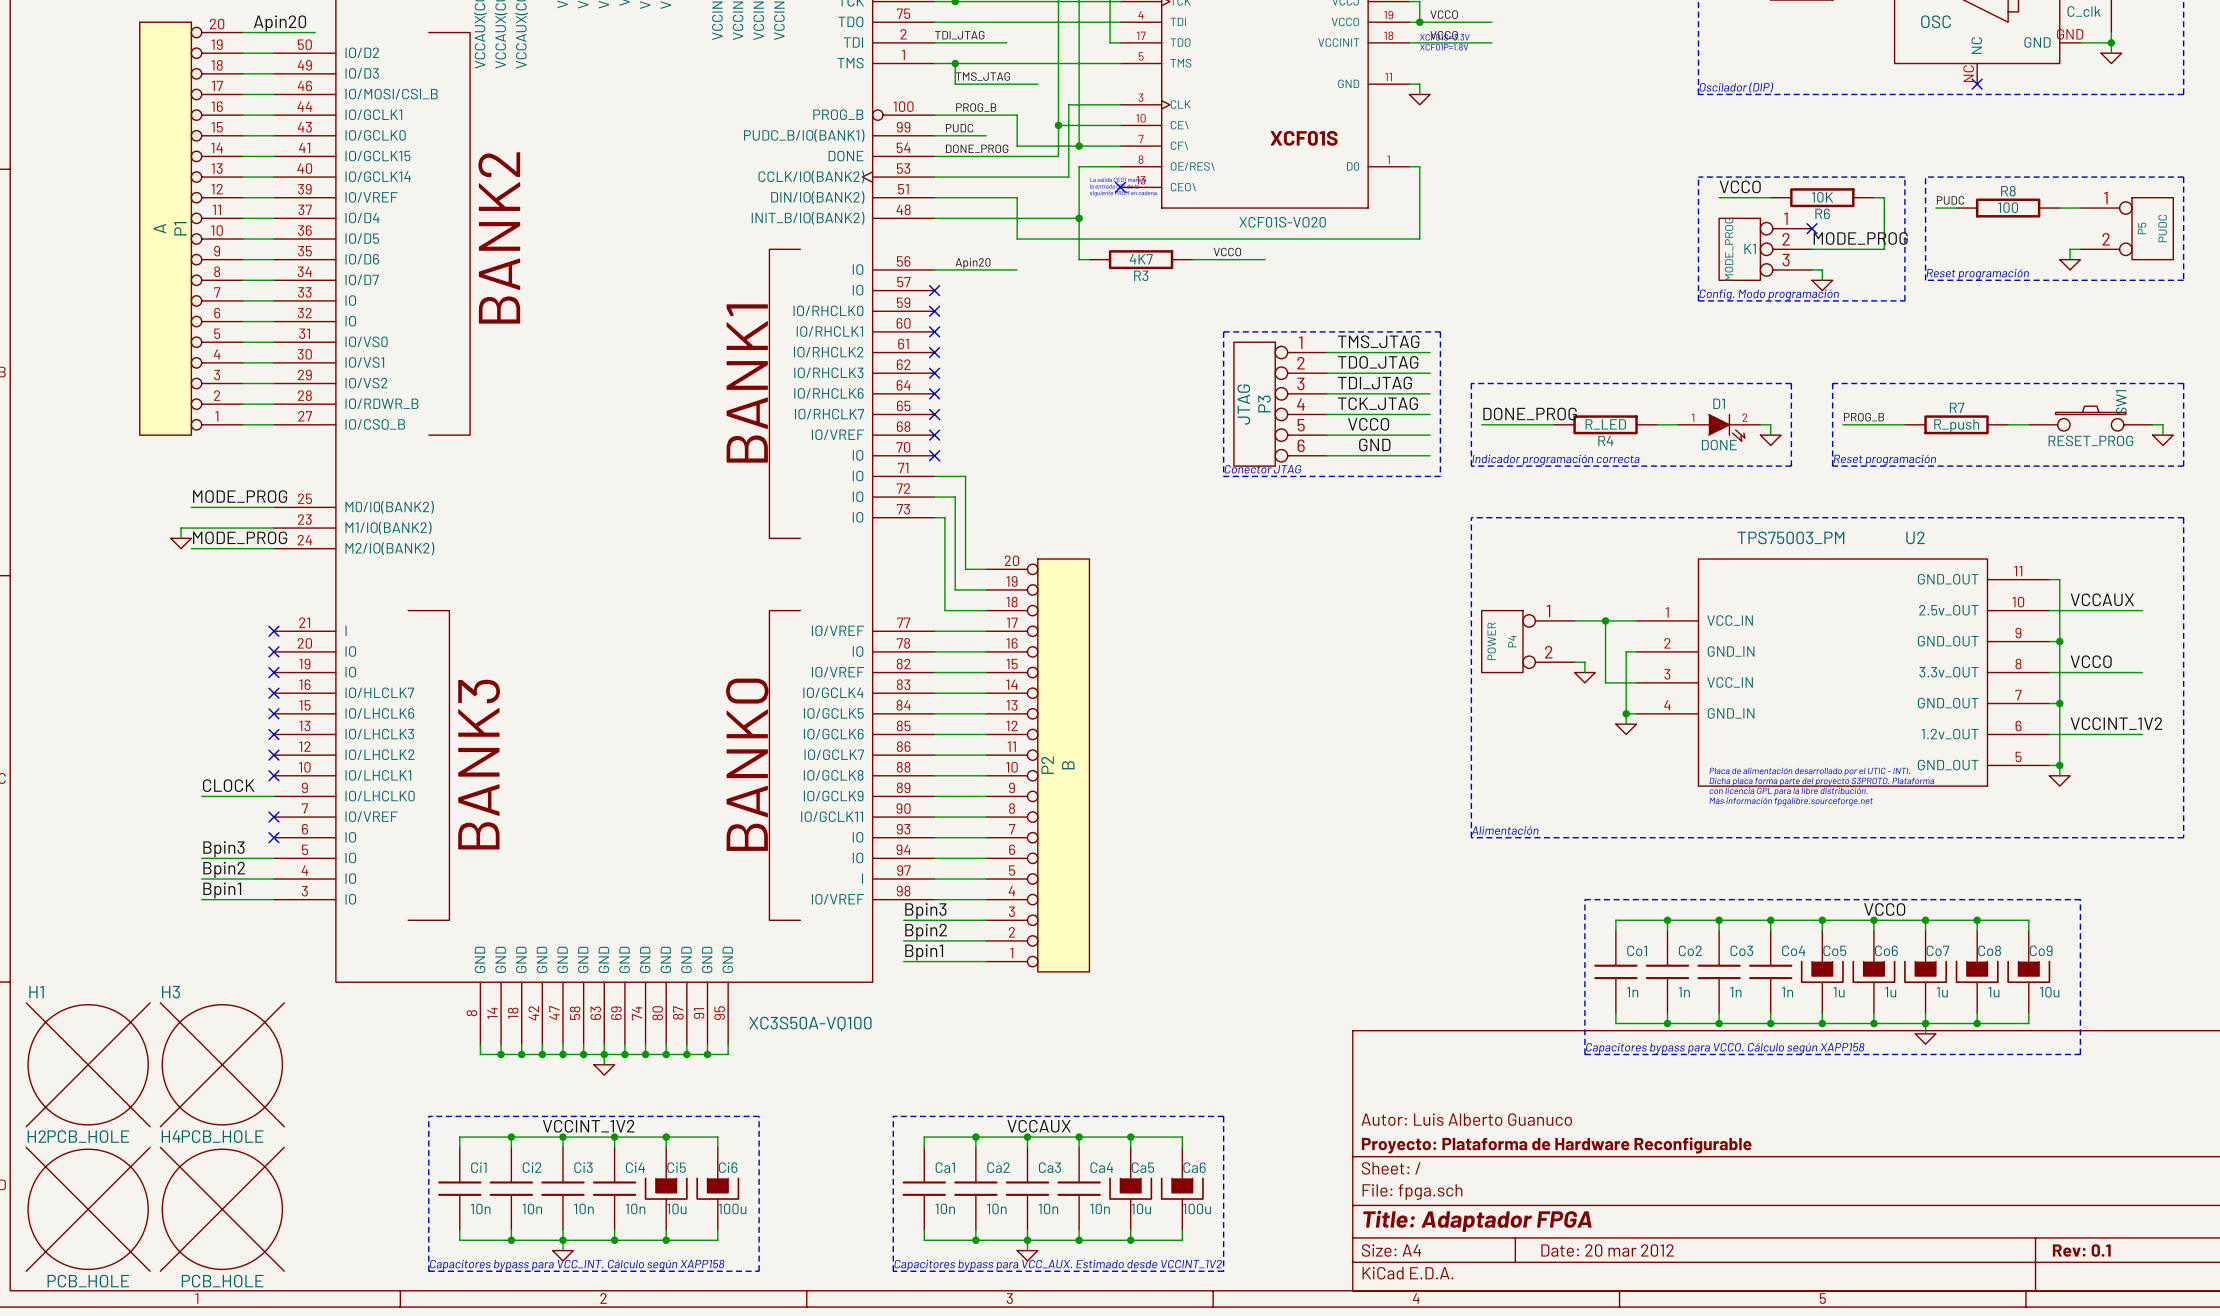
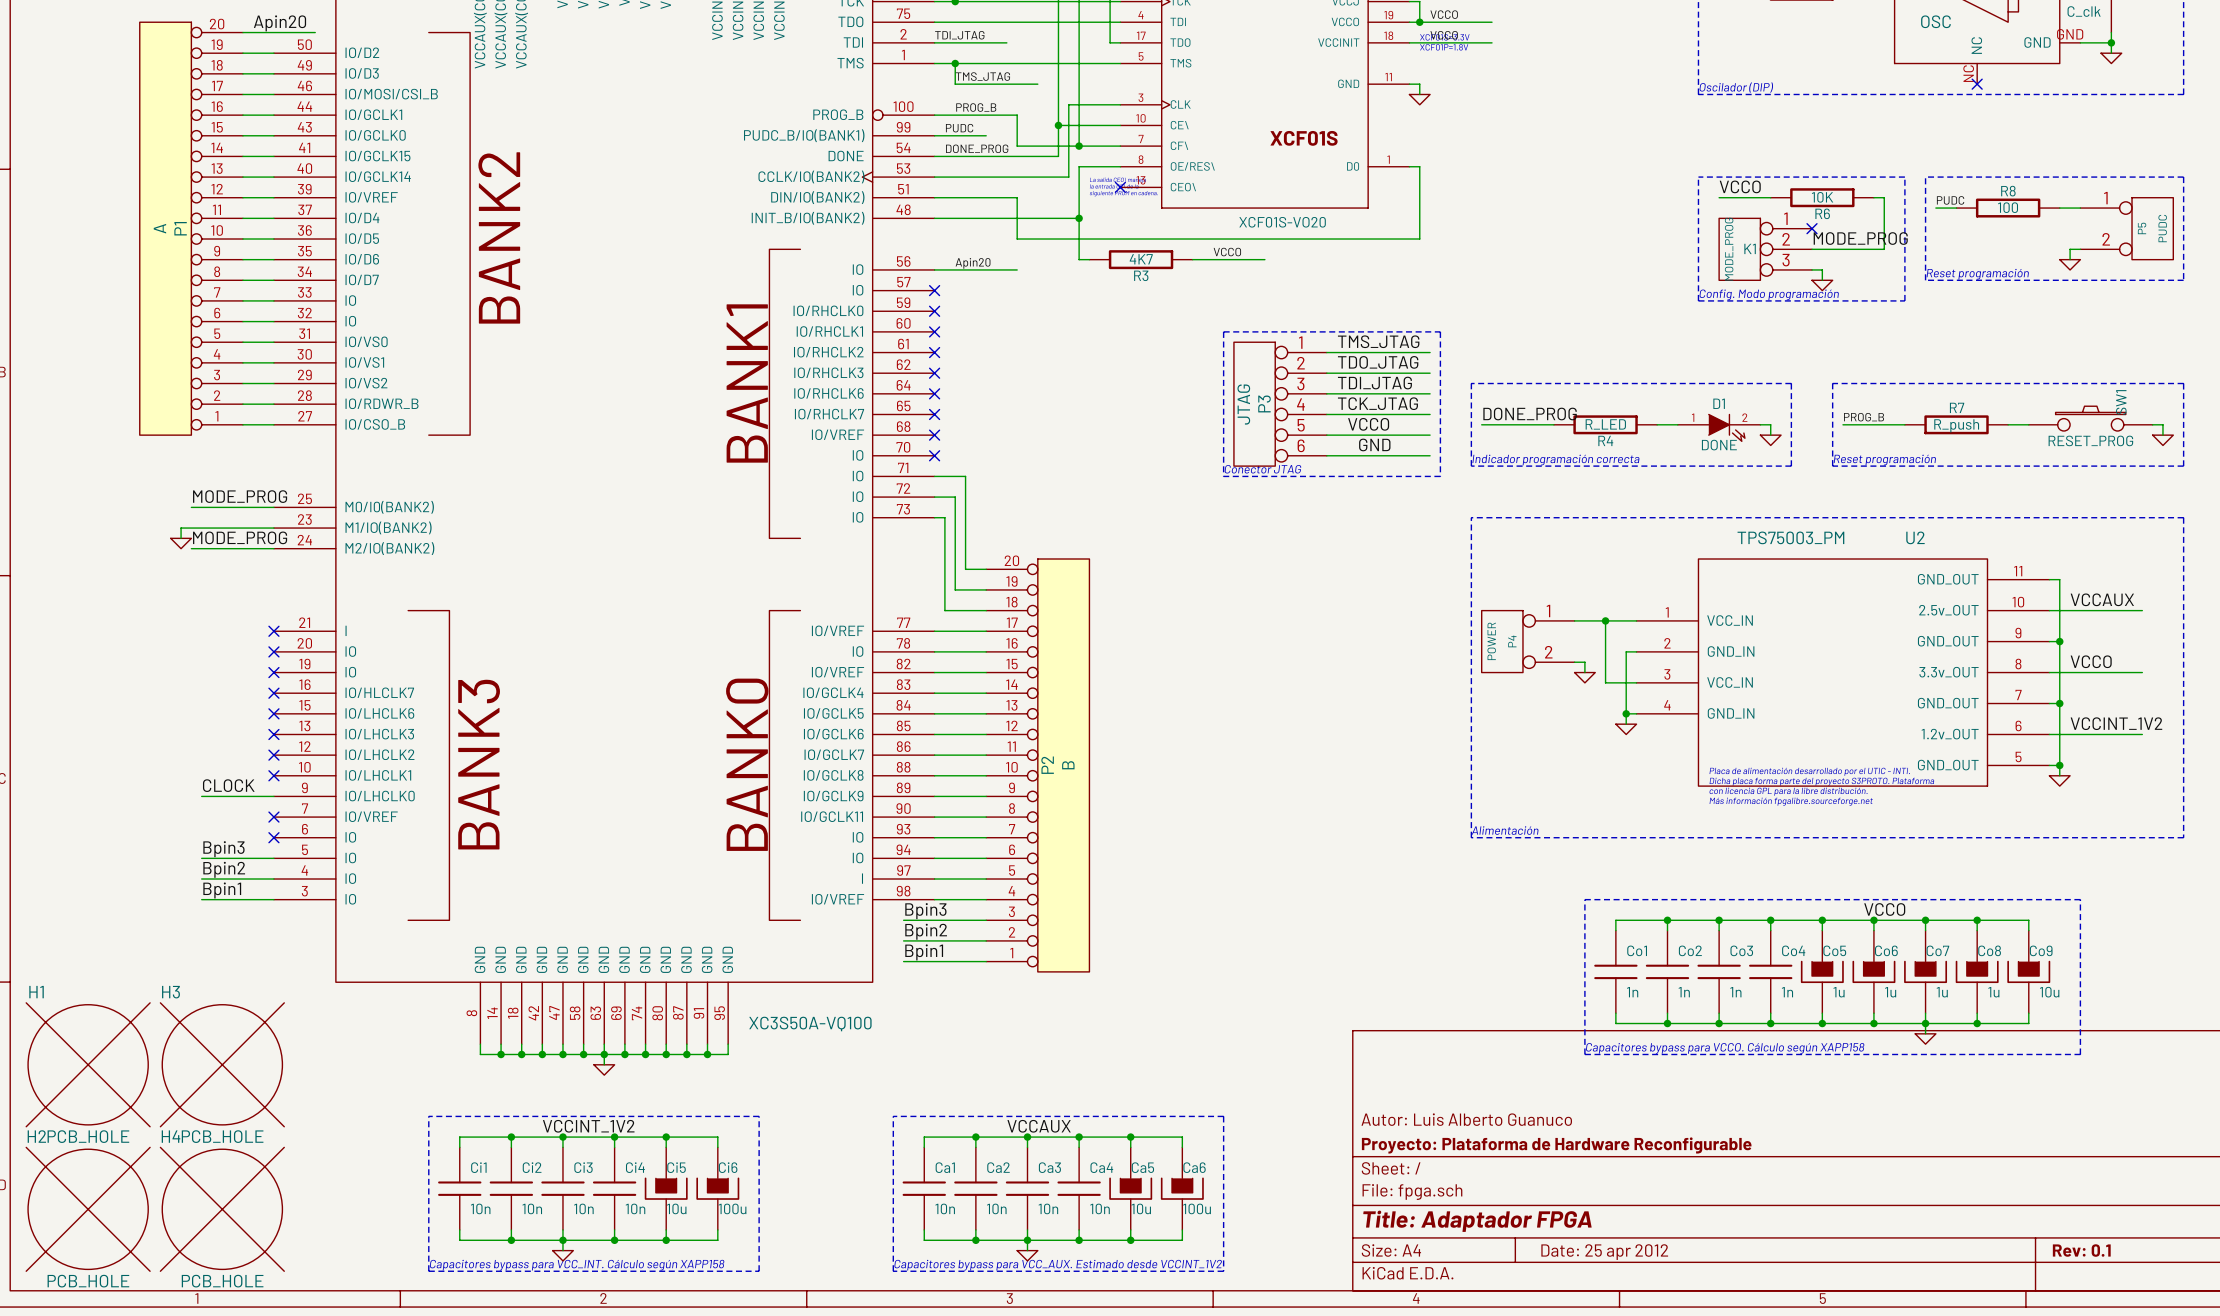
title block: Date: 20 mar 2012 (1607, 1250) -> Date: 25 apr 2012 (1604, 1252)

